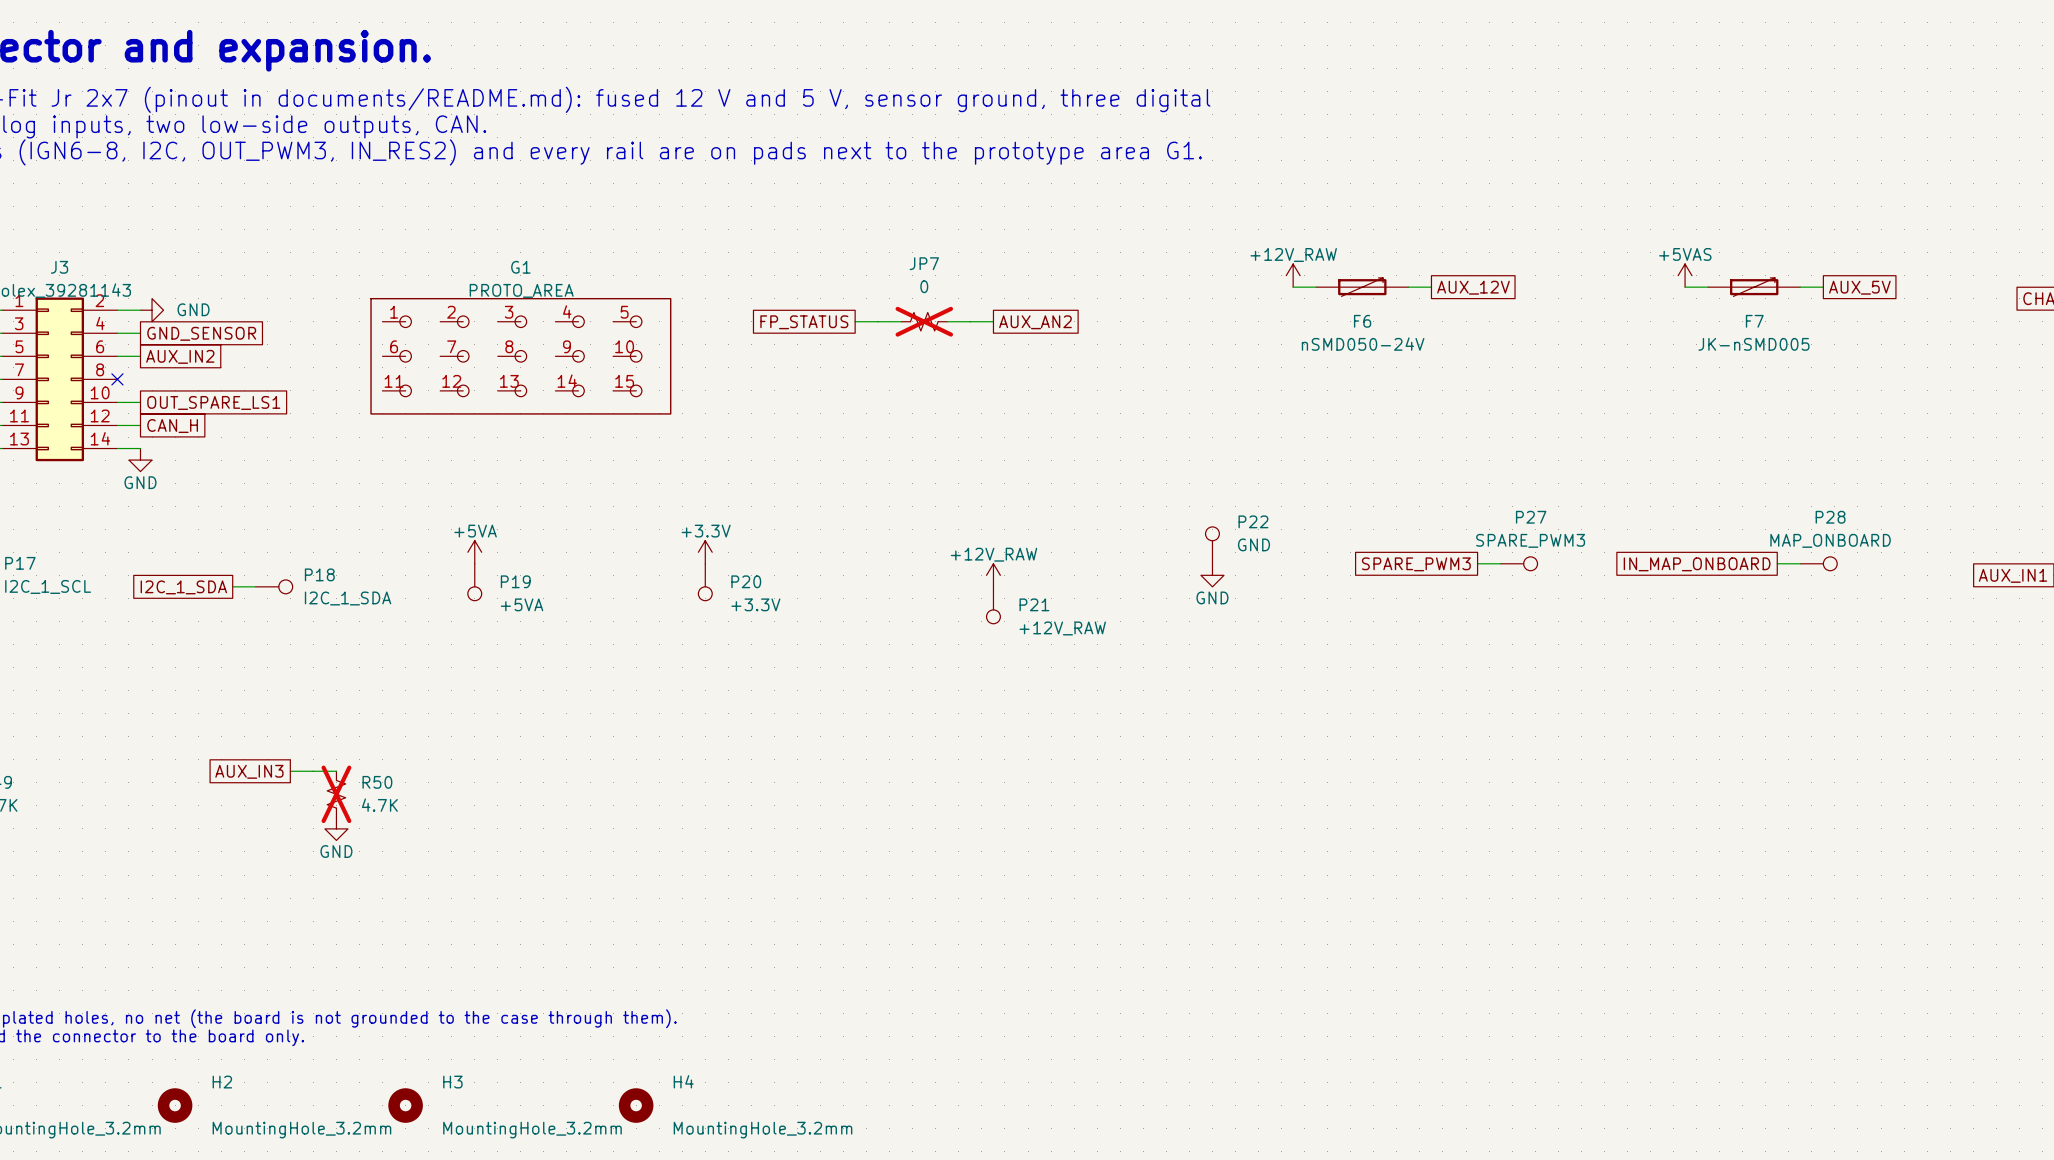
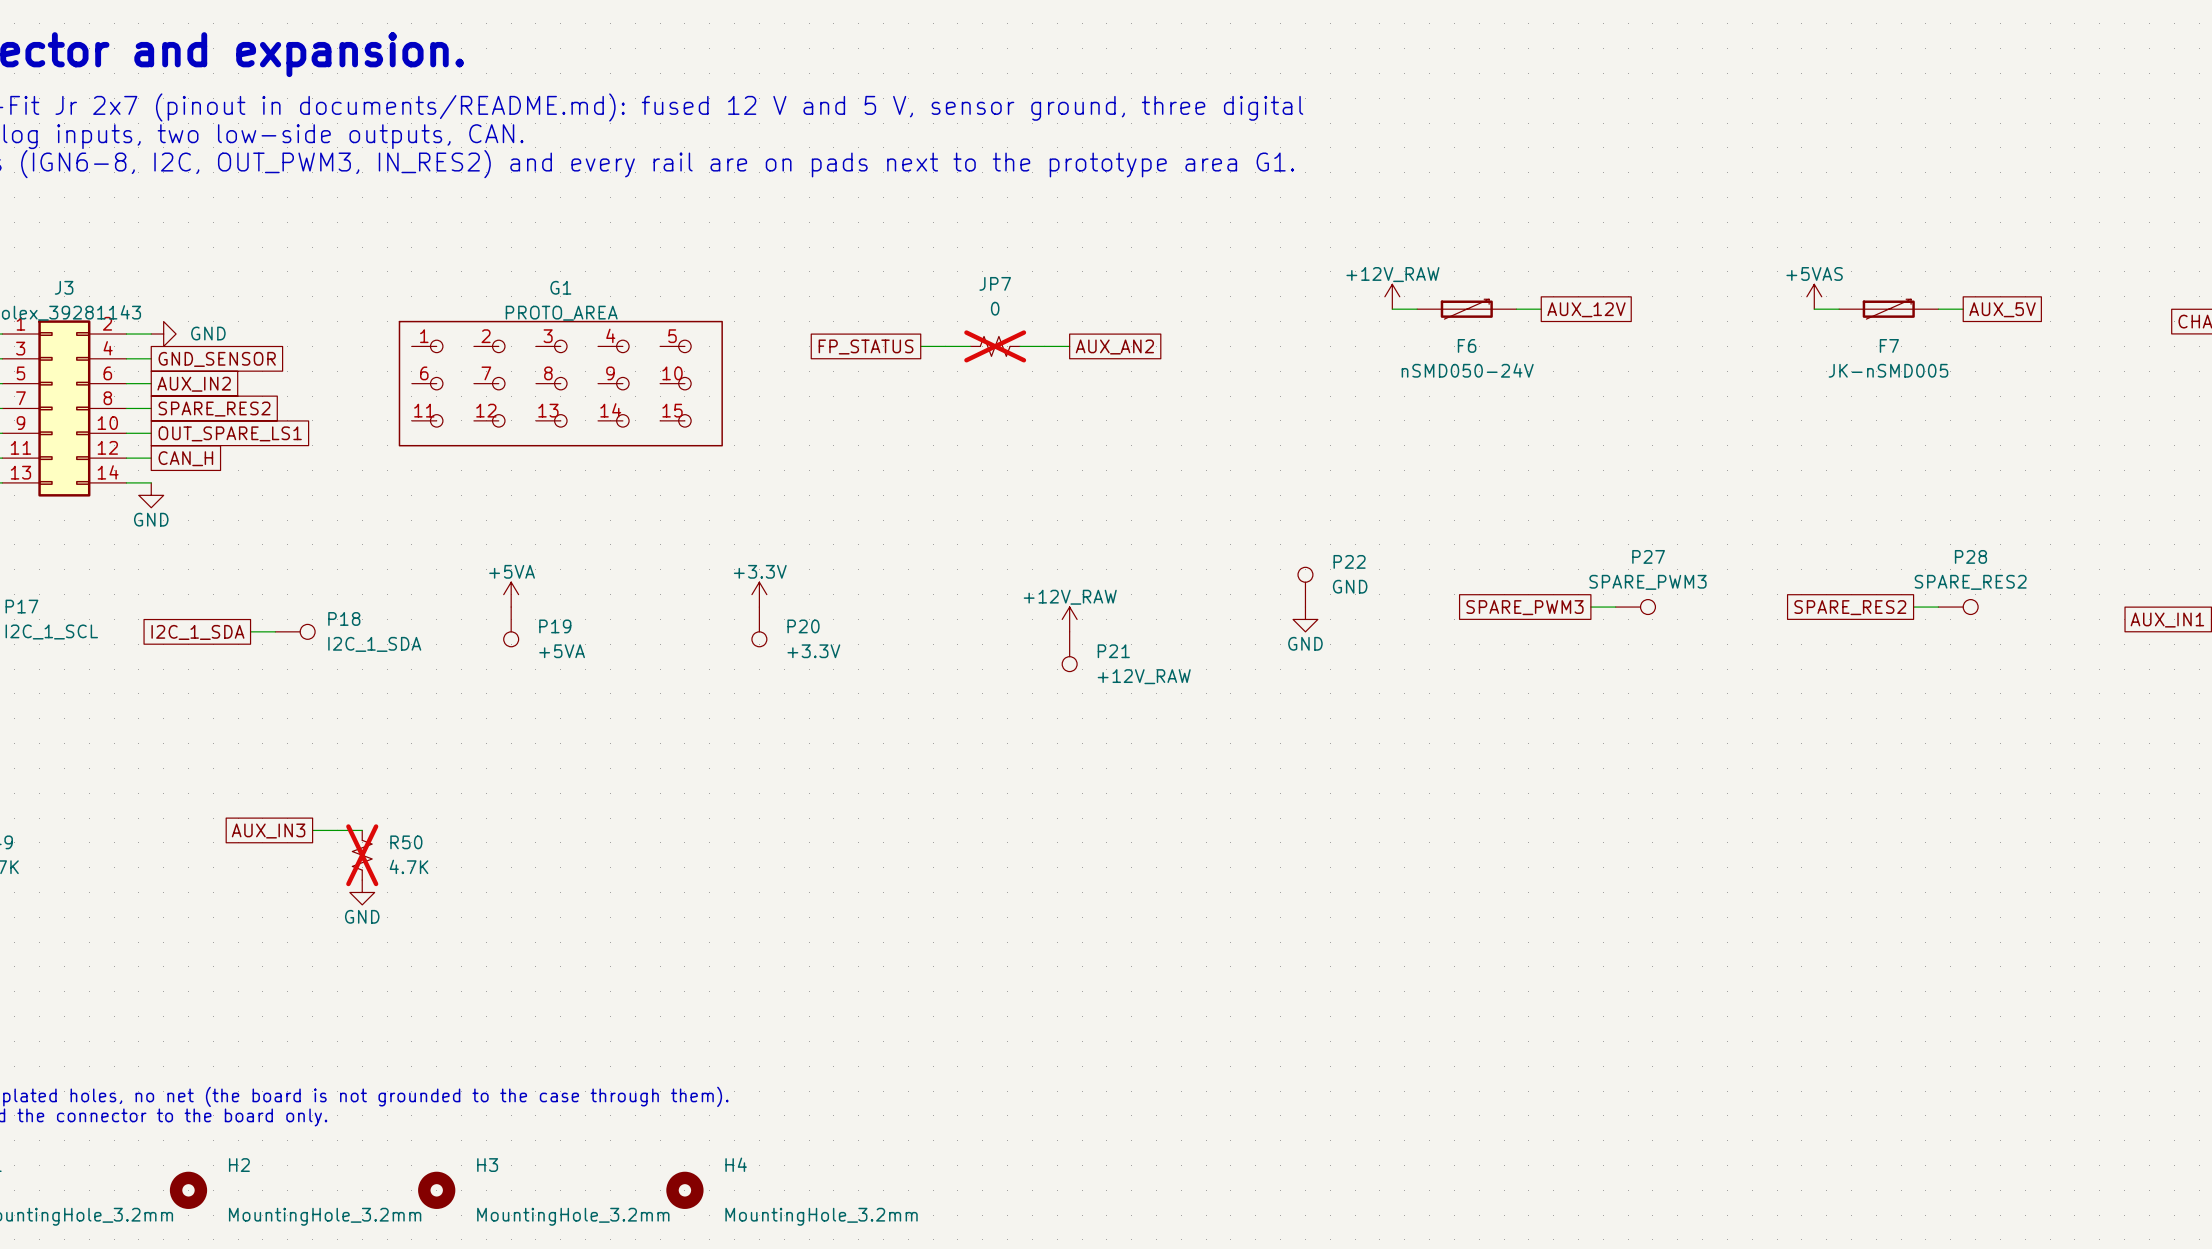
wire: none -> (126, 408) (151, 408)
no-connect mark: (117, 379) -> none
global label: none -> SPARE_RES2 (214, 409)
P28 value: MAP_ONBOARD (1830, 540) -> SPARE_RES2 (1970, 582)
global label: IN_MAP_ONBOARD (1697, 564) -> SPARE_RES2 (1850, 607)

